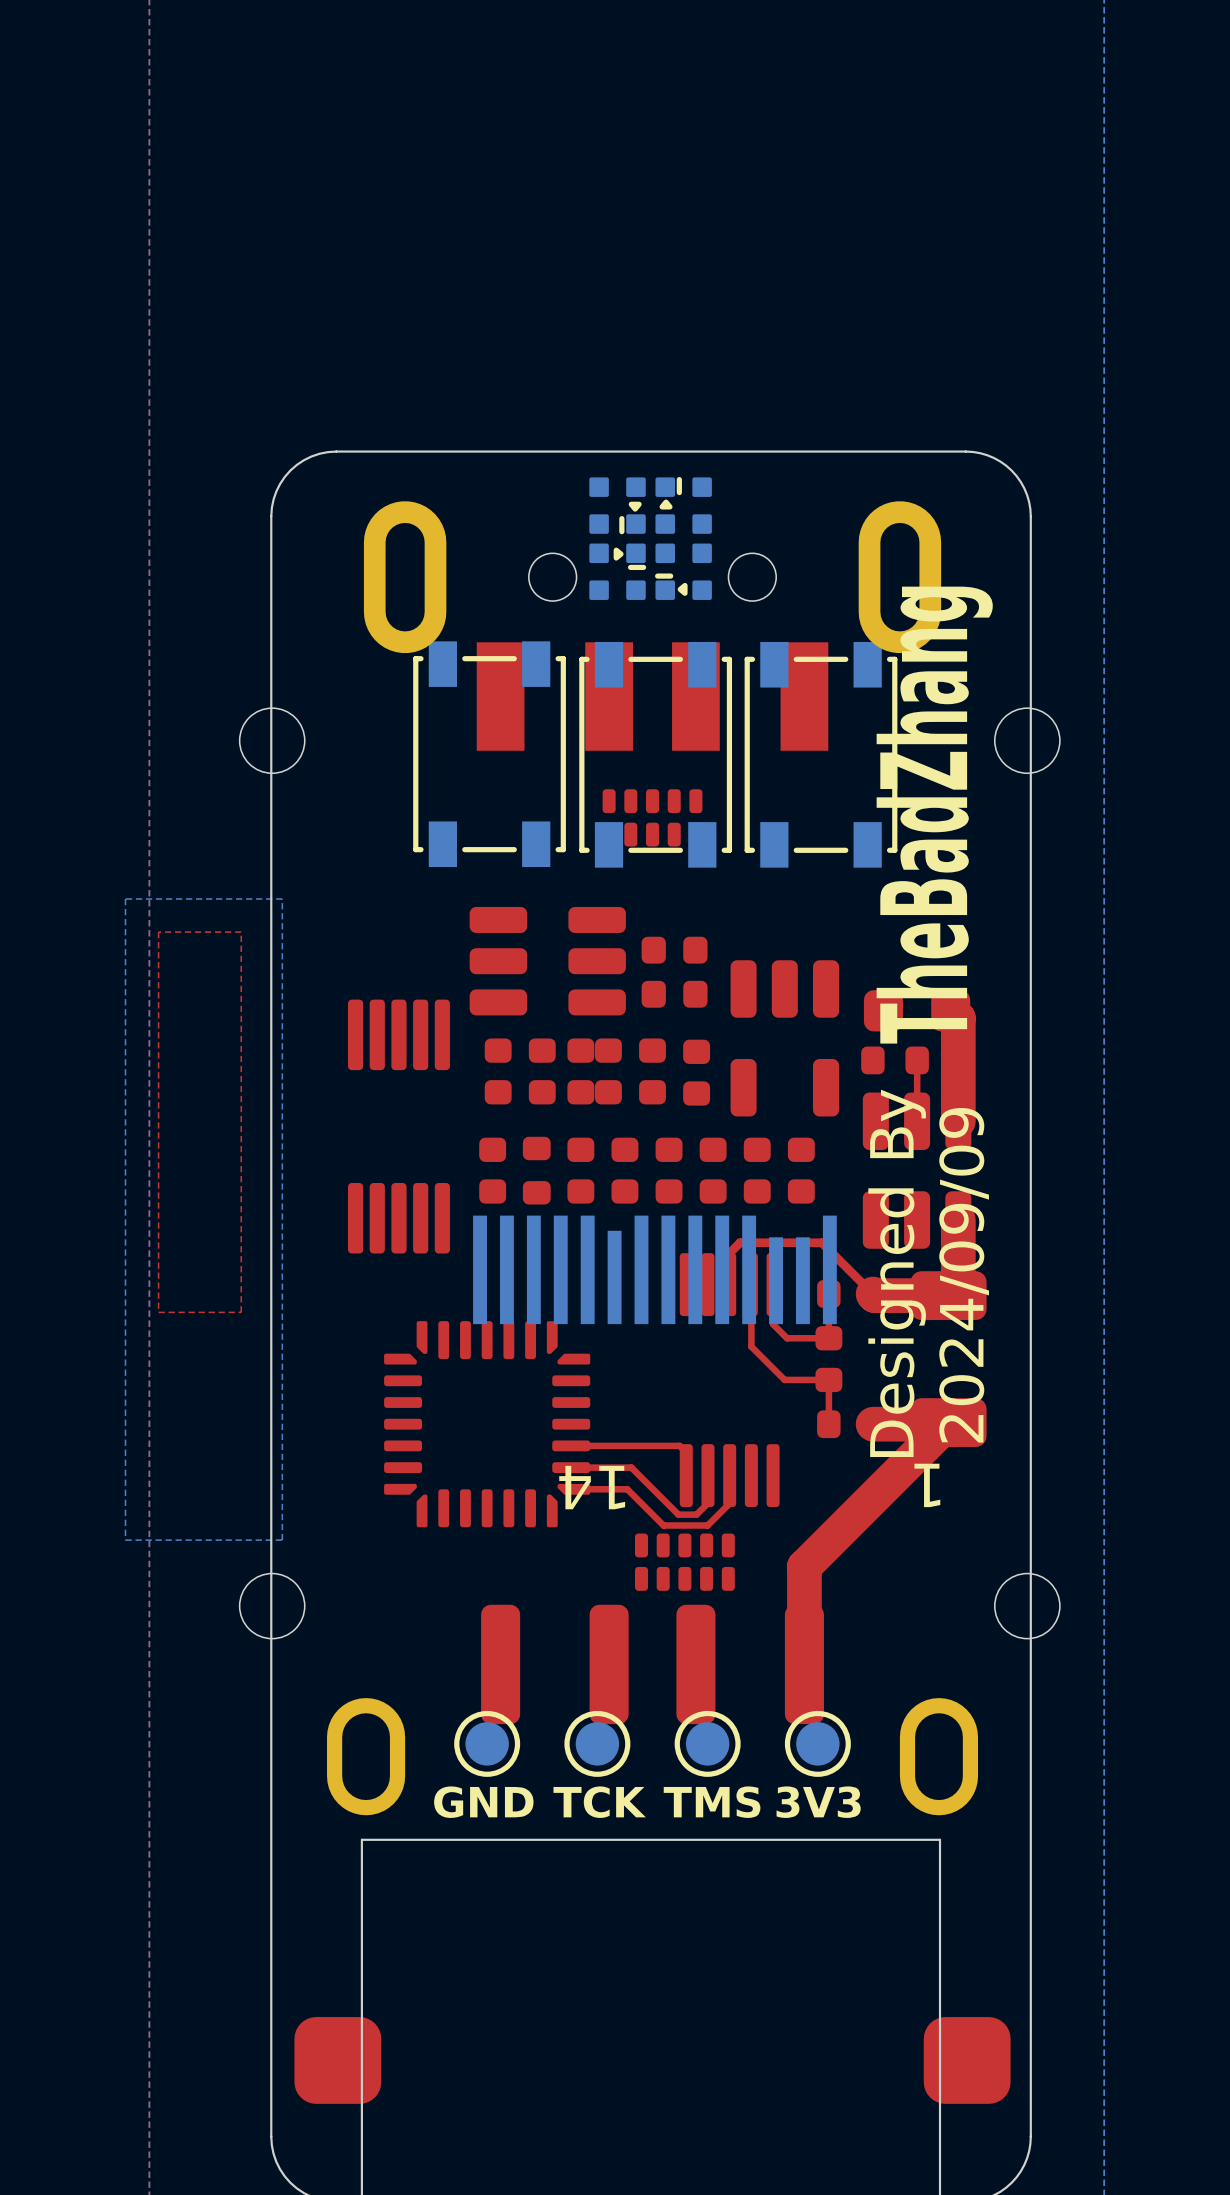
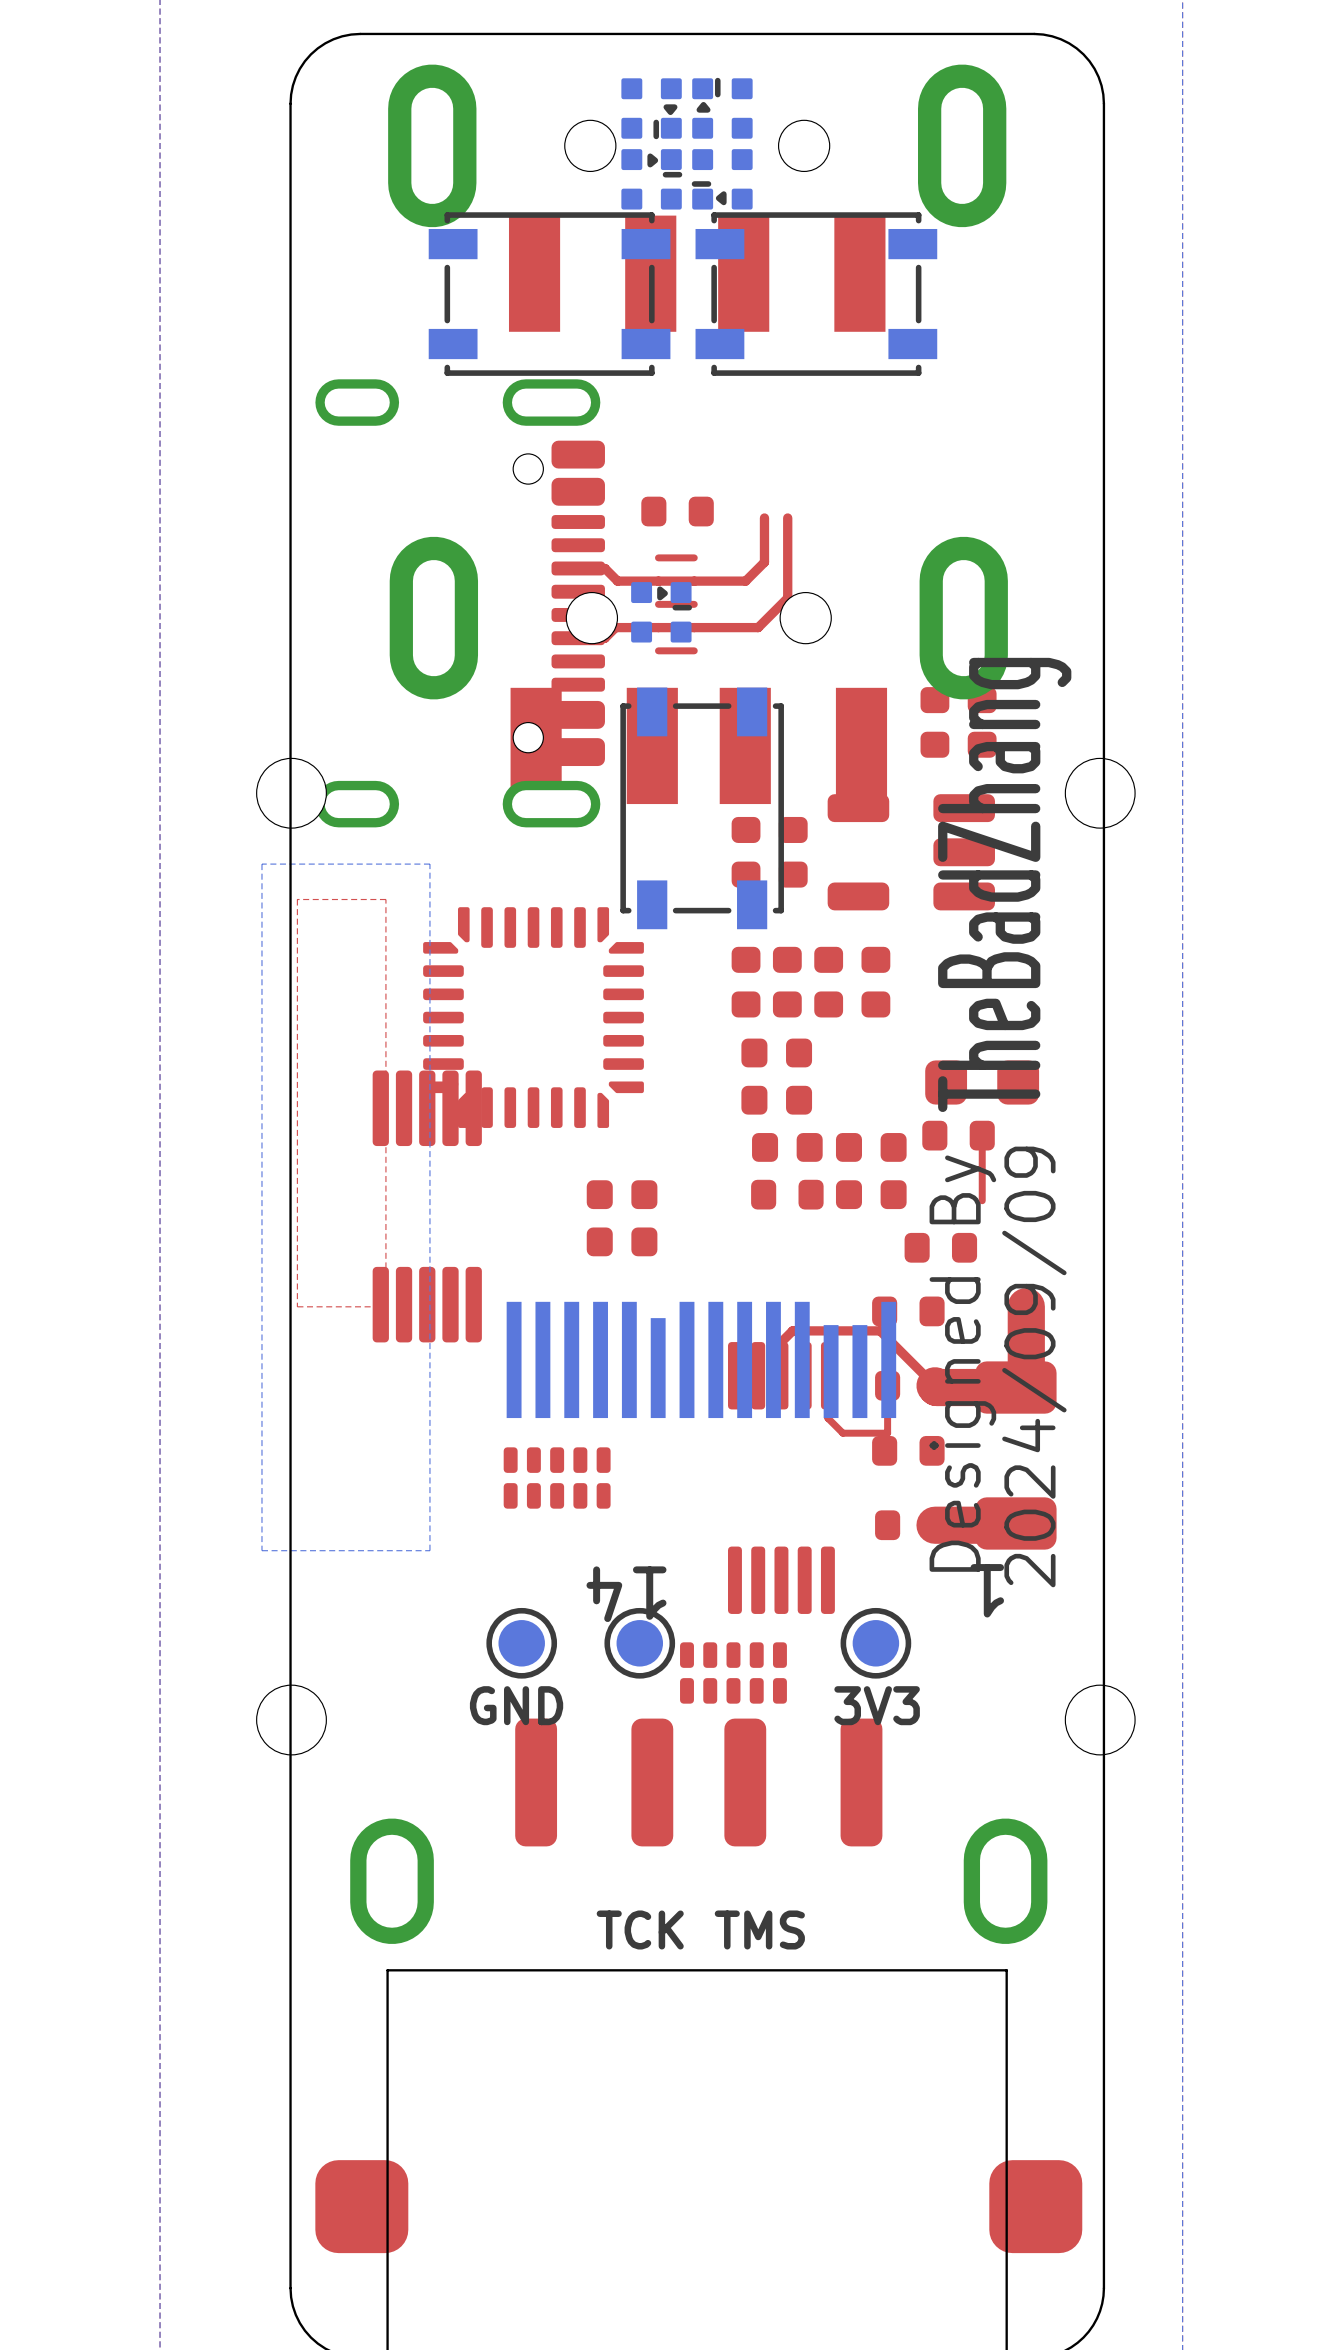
part: none -> (651, 108)
part: none -> (722, 108)
part: none -> (651, 179)
part: none -> (722, 179)
part: none -> (697, 198)
part: none -> (549, 294)
part: none -> (816, 294)
part: none -> (677, 511)
top track: none -> (764, 517) (764, 562) (745, 581) (617, 581) (604, 568) (578, 568)
top track: none -> (787, 517) (787, 598) (758, 627) (615, 627) (604, 638) (578, 638)
part: (617, 505) -> none
part: (683, 505) -> none
board edge: (271, 516) (273, 499) (284, 476) (303, 460) (327, 452) (965, 451) (987, 455) (1000, 461) (1011, 470) (1024, 488) (1029, 502) (1030, 516) -> (290, 552) (290, 103) (292, 85) (299, 68) (317, 48) (342, 36) (360, 33) (1034, 33) (1052, 36) (1076, 48) (1094, 68) (1103, 94) (1103, 553)
top track: none -> (694, 557) (658, 557)
part: none -> (460, 603)
top track: none -> (694, 604) (658, 604)
part: (683, 571) -> none
top track: none -> (694, 650) (658, 650)
part: none -> (934, 722)
part: none -> (982, 722)
part: (489, 754) -> none
part: (821, 754) -> none
part: none -> (746, 852)
part: none -> (793, 852)
part position: (652, 817) -> (557, 1478)
bottom zone outline: (282, 899) (125, 899) (125, 1540) (282, 1540) (282, 899) -> (429, 864) (261, 864) (261, 1550) (429, 1550) (429, 864)
part: none -> (746, 982)
part: none -> (787, 982)
part: none -> (828, 982)
part: none -> (875, 982)
top zone outline: (241, 932) (158, 932) (158, 1312) (241, 1312) (241, 932) -> (385, 899) (297, 899) (297, 1306) (385, 1306) (385, 899)
part: (674, 950) -> none
part: (547, 961) -> none
part: none -> (776, 1052)
part: (674, 994) -> none
top track: (950, 1010) (958, 1018) (958, 1121) -> none
part: none -> (776, 1100)
part rotation: 0° (784, 1038) -> 90° clockwise (911, 852)
part position: (784, 1038) -> (911, 852)
part: (498, 1071) -> none
part: (542, 1071) -> none
part: (580, 1071) -> none
part: (608, 1071) -> none
part: (652, 1071) -> none
part: none -> (787, 1147)
part: none -> (871, 1147)
part: (696, 1072) -> none
part: none -> (622, 1194)
part: none -> (787, 1194)
part: none -> (871, 1194)
part: none -> (940, 1247)
part: (492, 1170) -> none
part: (536, 1170) -> none
part rotation: 0° (580, 1170) -> 90° clockwise (622, 1241)
part: (624, 1170) -> none
part: (669, 1170) -> none
part: (713, 1170) -> none
part: (757, 1170) -> none
part: (801, 1170) -> none
part: (917, 1170) -> none
part: none -> (908, 1311)
top track: (751, 1284) (751, 1346) (784, 1379) (828, 1379) (828, 1424) -> none
part footprint: [815, 1326, 843, 1393] -> [872, 1435, 945, 1466]
top track: (948, 1422) (804, 1566) (804, 1664) -> none
part position: (487, 1424) -> (533, 1017)
top track: (571, 1445) (679, 1445) (685, 1451) (686, 1475) -> none
top track: (571, 1467) (631, 1467) (678, 1514) (696, 1514) (707, 1503) (707, 1475) -> none
top track: (729, 1475) (729, 1503) (707, 1525) (663, 1525) (627, 1489) (573, 1489) -> none
part: none -> (521, 1643)
part: none -> (639, 1643)
part: none -> (875, 1643)
part: (487, 1743) -> none
part: (597, 1743) -> none
part: (707, 1743) -> none
part: (817, 1743) -> none
text position: GND (483, 1802) -> GND (516, 1705)
text position: 3V3 (818, 1802) -> 3V3 (877, 1705)

